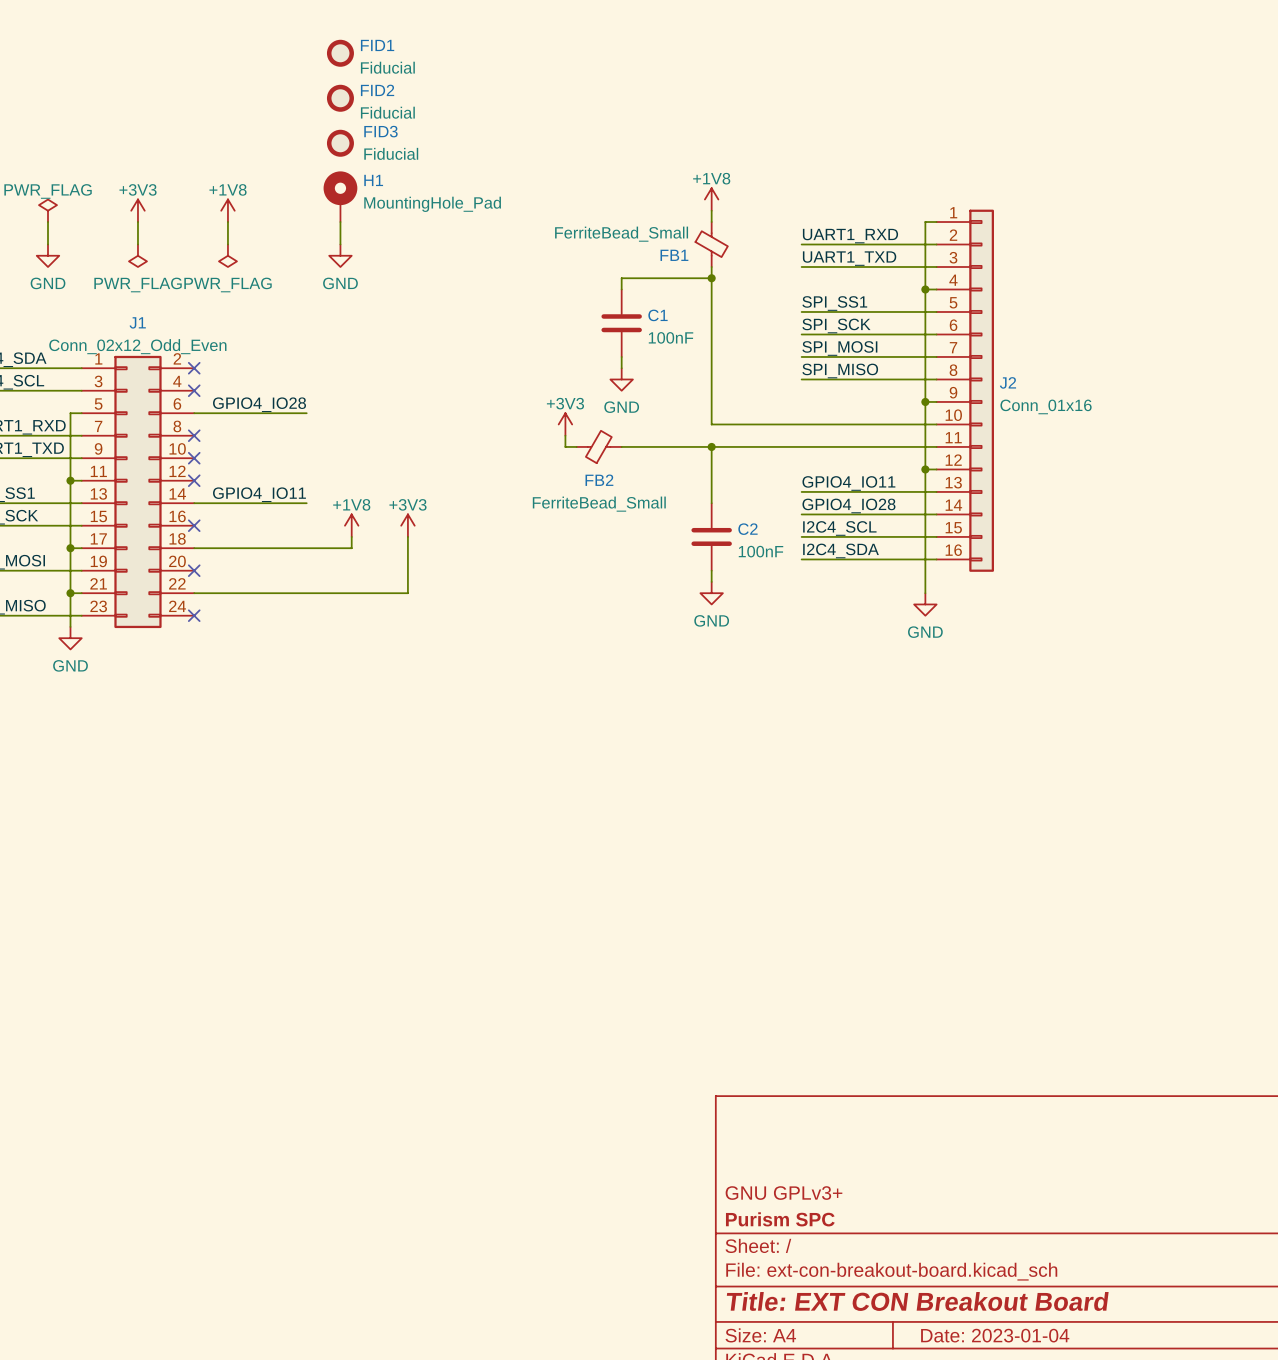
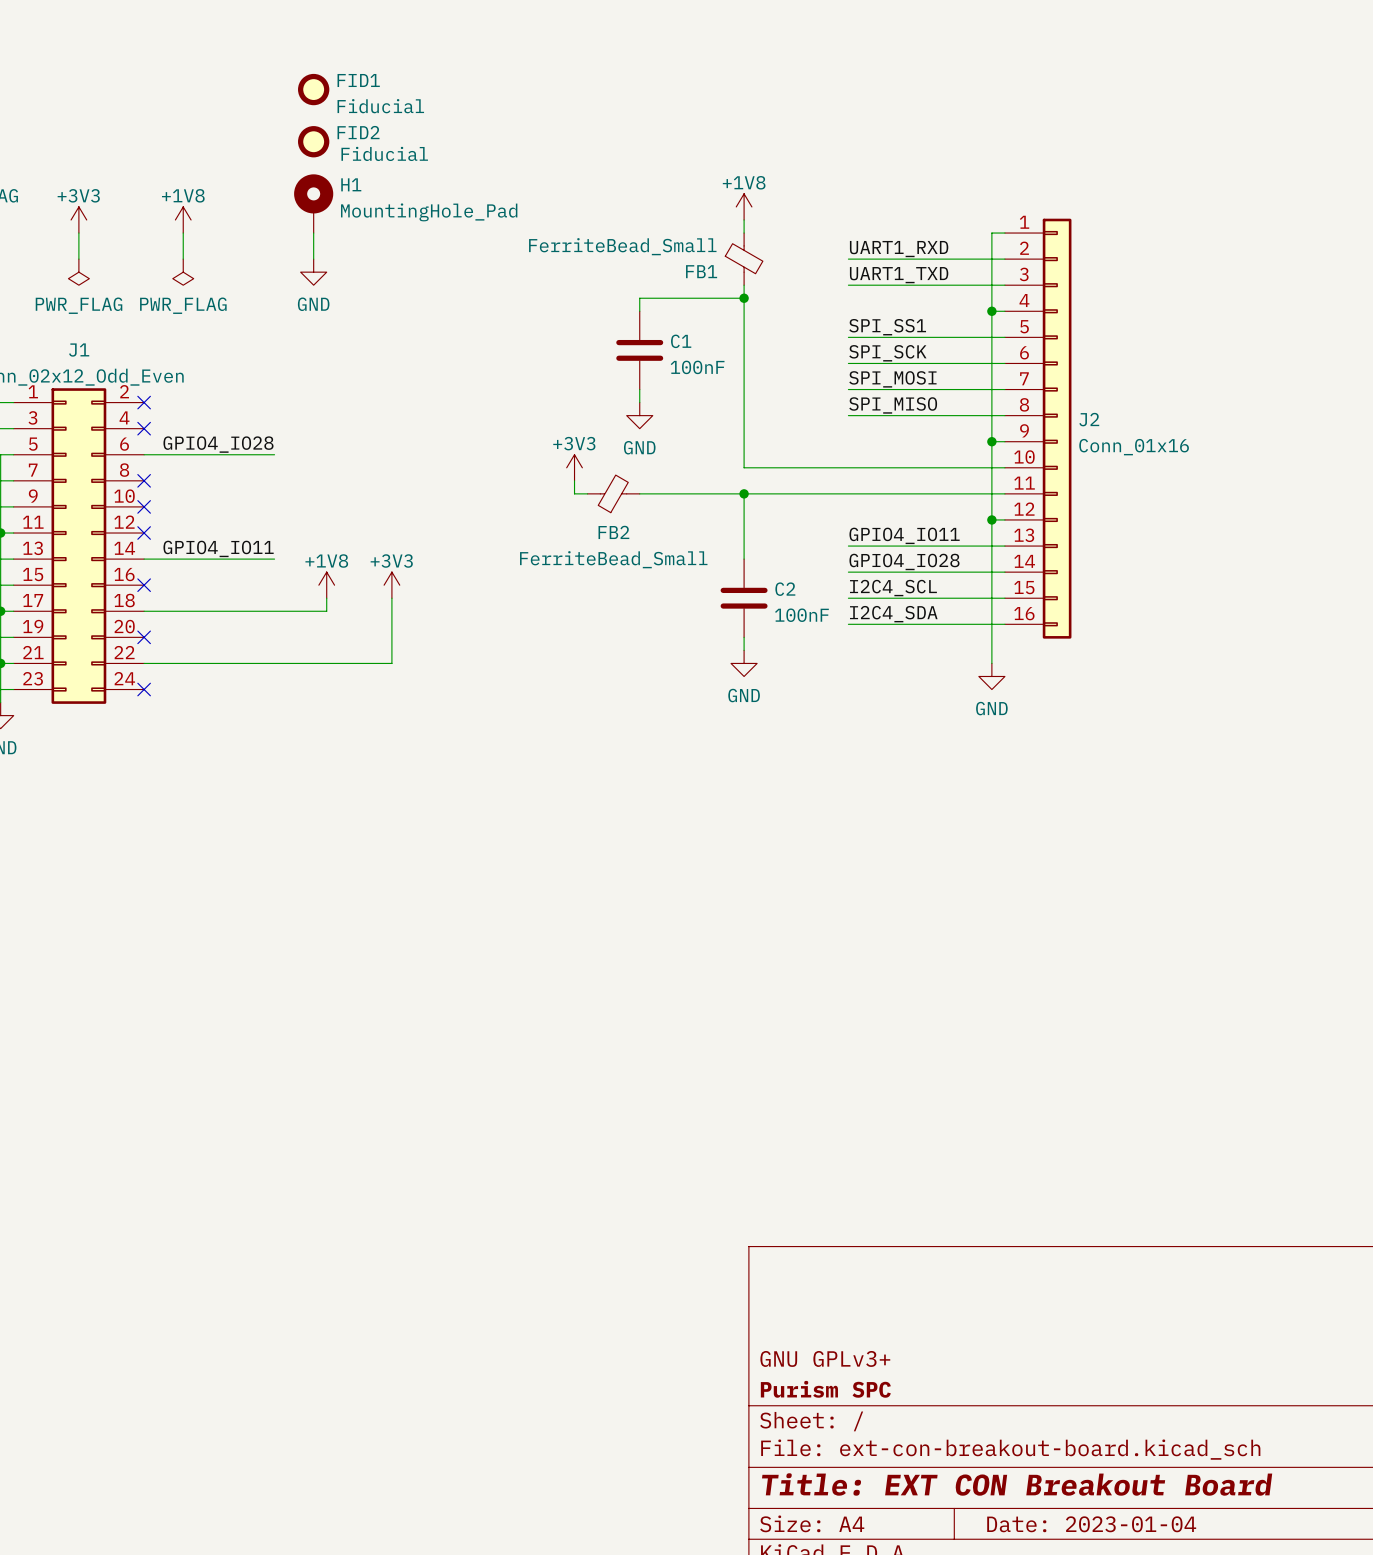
FID1: Fiducial (340, 53) -> none
FID2 name: FID2 (377, 90) -> FID1 (358, 80)
FID3 name: FID3 (380, 131) -> FID2 (358, 132)

